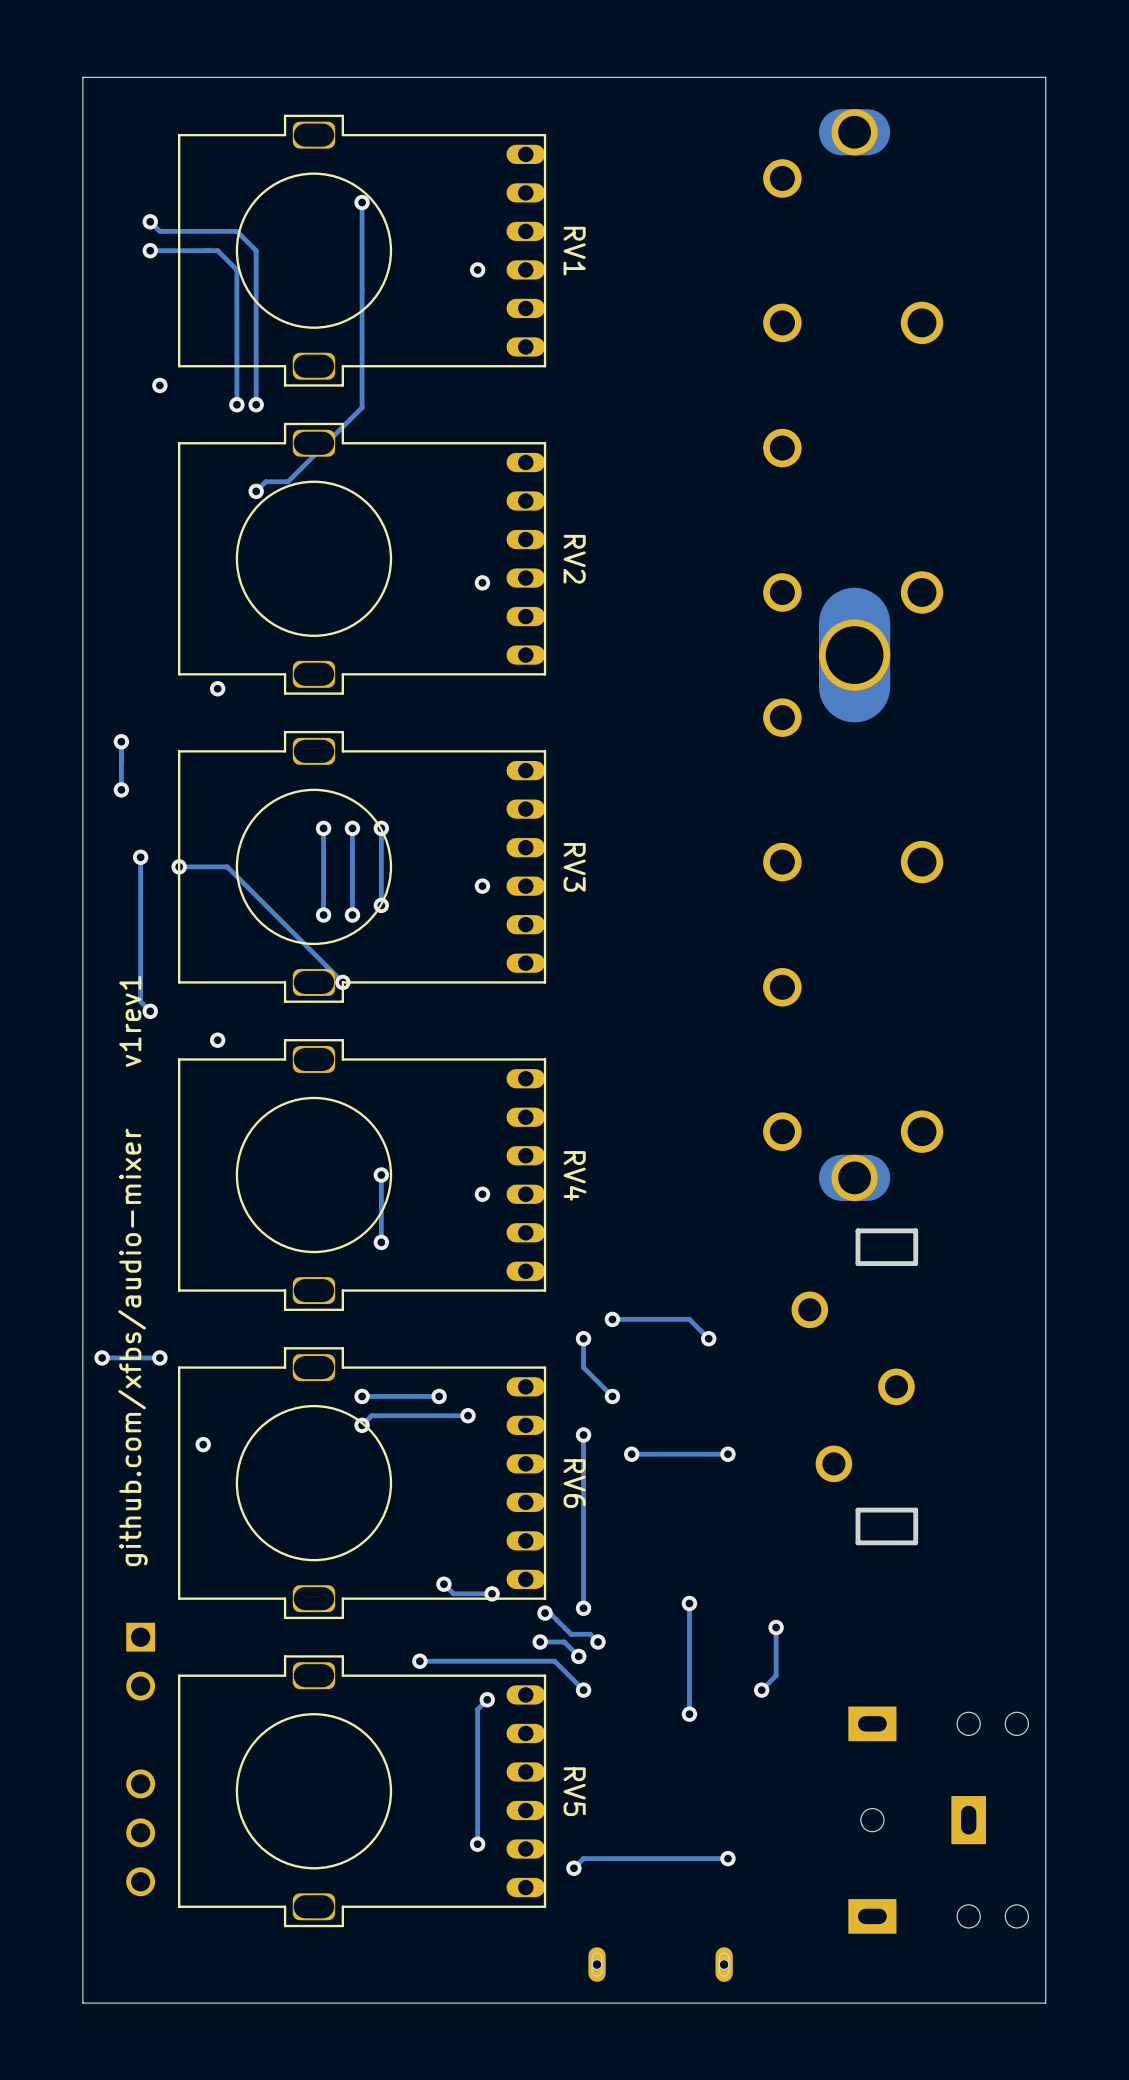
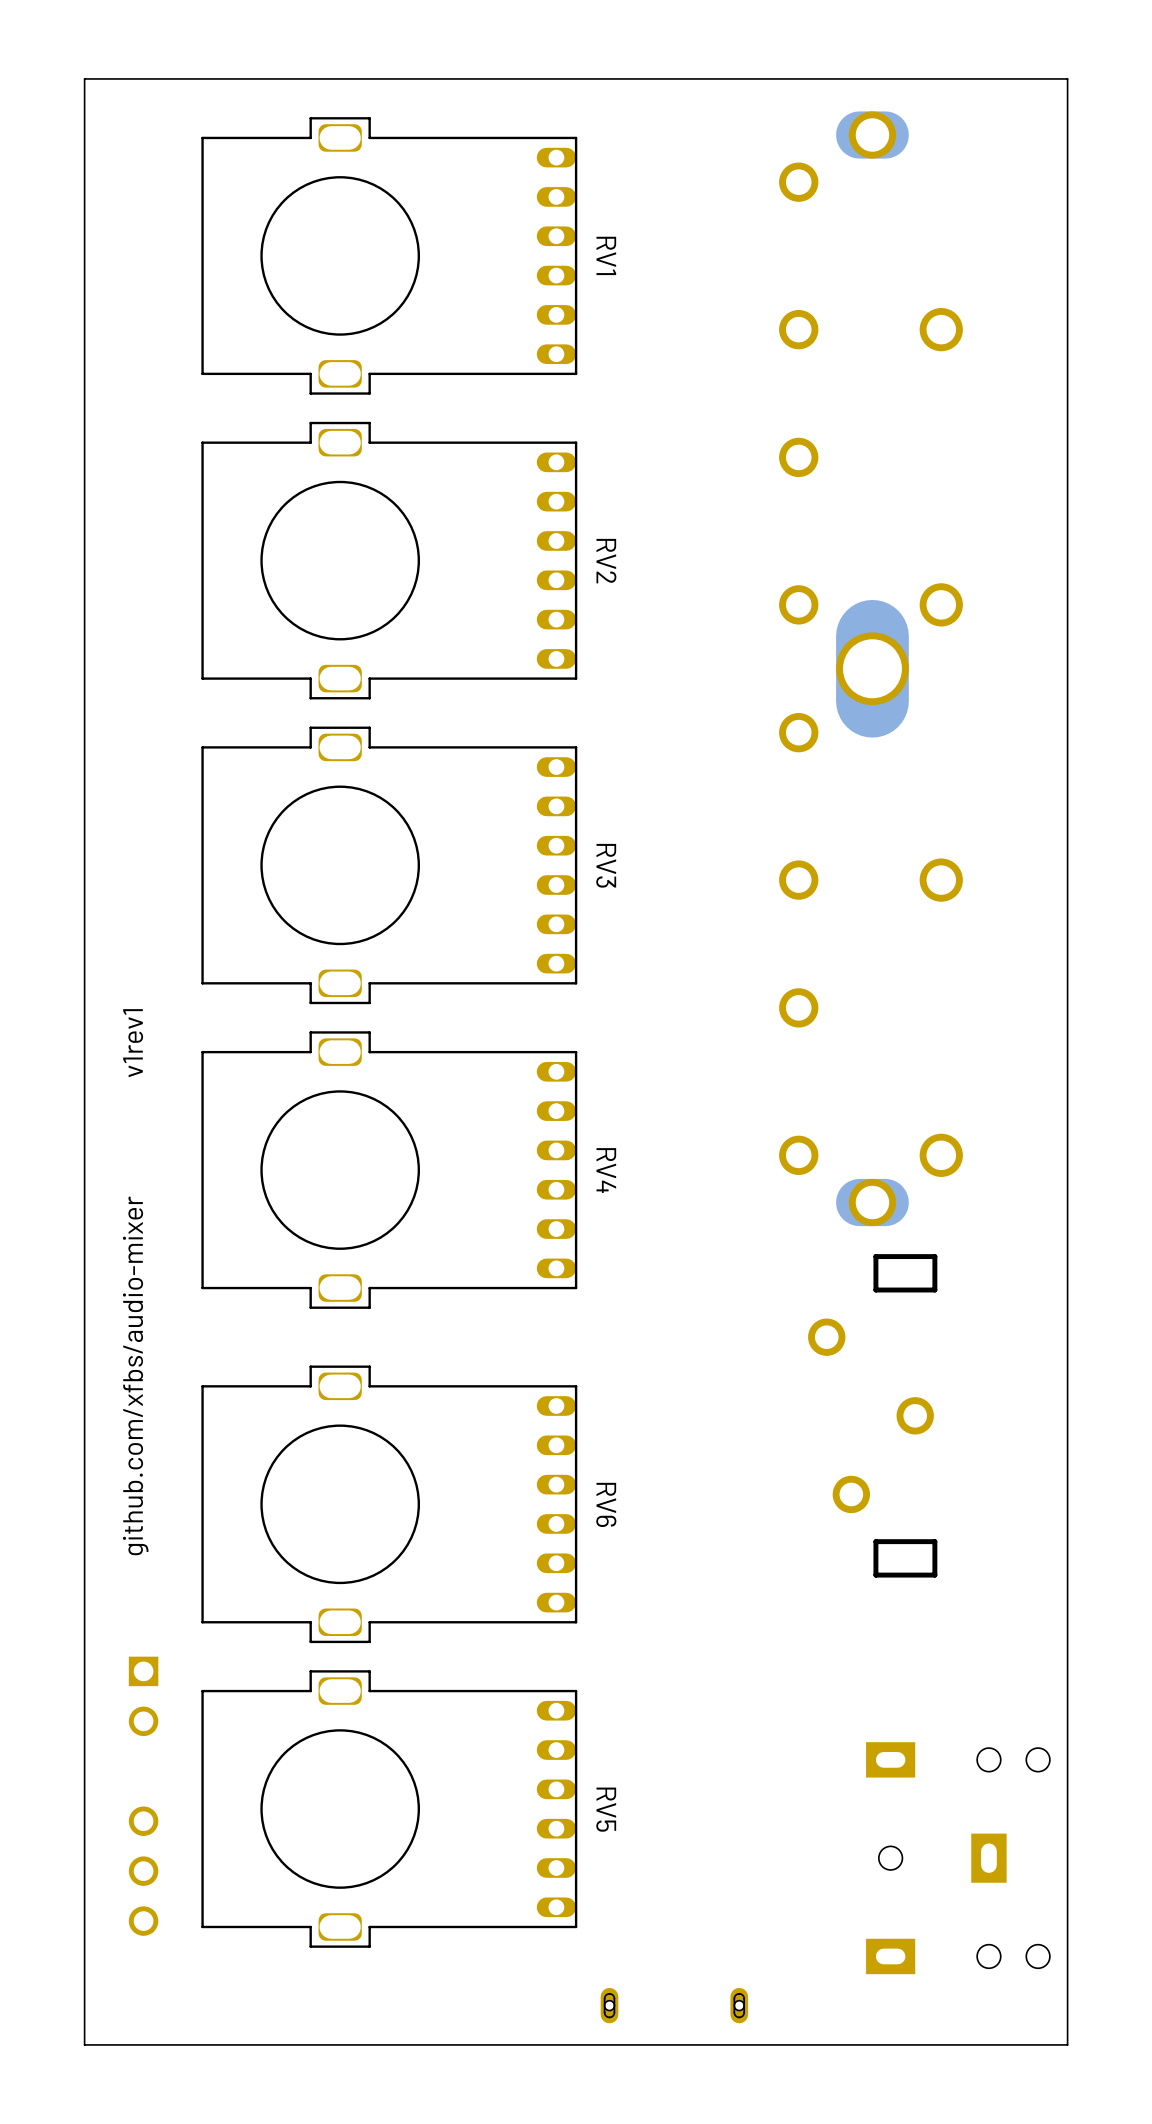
track: (362, 202) (362, 407) (288, 481) (265, 481) (256, 491) -> none
via: (362, 202) -> none
track: (150, 221) (159, 231) (236, 231) (256, 250) (256, 404) -> none
via: (150, 221) -> none
track: (150, 250) (217, 250) (236, 269) (236, 404) -> none
via: (150, 250) -> none
RV1 position: (362, 250) -> (389, 255)
via: (477, 269) -> none
via: (159, 385) -> none
via: (236, 404) -> none
via: (256, 404) -> none
via: (256, 491) -> none
RV2 position: (362, 558) -> (389, 560)
via: (482, 582) -> none
via: (217, 688) -> none
track: (121, 741) (121, 789) -> none
via: (121, 741) -> none
via: (121, 789) -> none
track: (323, 828) (323, 915) -> none
via: (323, 828) -> none
track: (352, 828) (352, 915) -> none
via: (352, 828) -> none
track: (381, 828) (381, 905) -> none
via: (381, 828) -> none
track: (140, 857) (140, 1001) (150, 1011) -> none
via: (140, 857) -> none
track: (179, 866) (227, 866) (342, 982) -> none
via: (179, 866) -> none
RV3 position: (362, 866) -> (389, 865)
via: (482, 886) -> none
via: (381, 905) -> none
via: (323, 915) -> none
via: (352, 915) -> none
via: (342, 982) -> none
via: (150, 1011) -> none
via: (217, 1040) -> none
RV4 position: (362, 1175) -> (389, 1170)
track: (381, 1175) (381, 1242) -> none
via: (381, 1175) -> none
via: (482, 1194) -> none
via: (381, 1242) -> none
track: (612, 1319) (689, 1319) (708, 1338) -> none
via: (612, 1319) -> none
track: (583, 1338) (583, 1367) (612, 1396) -> none
via: (583, 1338) -> none
via: (708, 1338) -> none
via: (102, 1357) -> none
track: (159, 1357) (102, 1357) -> none
via: (159, 1357) -> none
via: (362, 1396) -> none
track: (439, 1396) (362, 1396) -> none
via: (439, 1396) -> none
via: (612, 1396) -> none
track: (468, 1415) (371, 1415) (362, 1425) -> none
via: (468, 1415) -> none
via: (362, 1425) -> none
track: (583, 1434) (583, 1608) -> none
via: (583, 1434) -> none
via: (203, 1444) -> none
via: (631, 1454) -> none
track: (727, 1454) (631, 1454) -> none
via: (727, 1454) -> none
RV6 position: (362, 1483) -> (389, 1504)
track: (443, 1584) (453, 1593) (492, 1593) -> none
via: (443, 1584) -> none
via: (492, 1593) -> none
track: (689, 1603) (689, 1714) -> none
via: (689, 1603) -> none
via: (583, 1608) -> none
track: (545, 1613) (549, 1613) (571, 1634) (590, 1634) (597, 1641) -> none
via: (545, 1613) -> none
track: (776, 1627) (776, 1675) (761, 1690) -> none
via: (776, 1627) -> none
track: (540, 1641) (564, 1641) (578, 1656) -> none
via: (540, 1641) -> none
via: (597, 1641) -> none
via: (578, 1656) -> none
track: (419, 1661) (554, 1661) (583, 1690) -> none
via: (419, 1661) -> none
via: (583, 1690) -> none
via: (761, 1690) -> none
track: (487, 1699) (477, 1709) (477, 1844) -> none
via: (487, 1699) -> none
via: (689, 1714) -> none
RV5 position: (362, 1791) -> (389, 1809)
via: (477, 1844) -> none
track: (727, 1858) (583, 1858) (573, 1868) -> none
via: (727, 1858) -> none
via: (573, 1868) -> none

